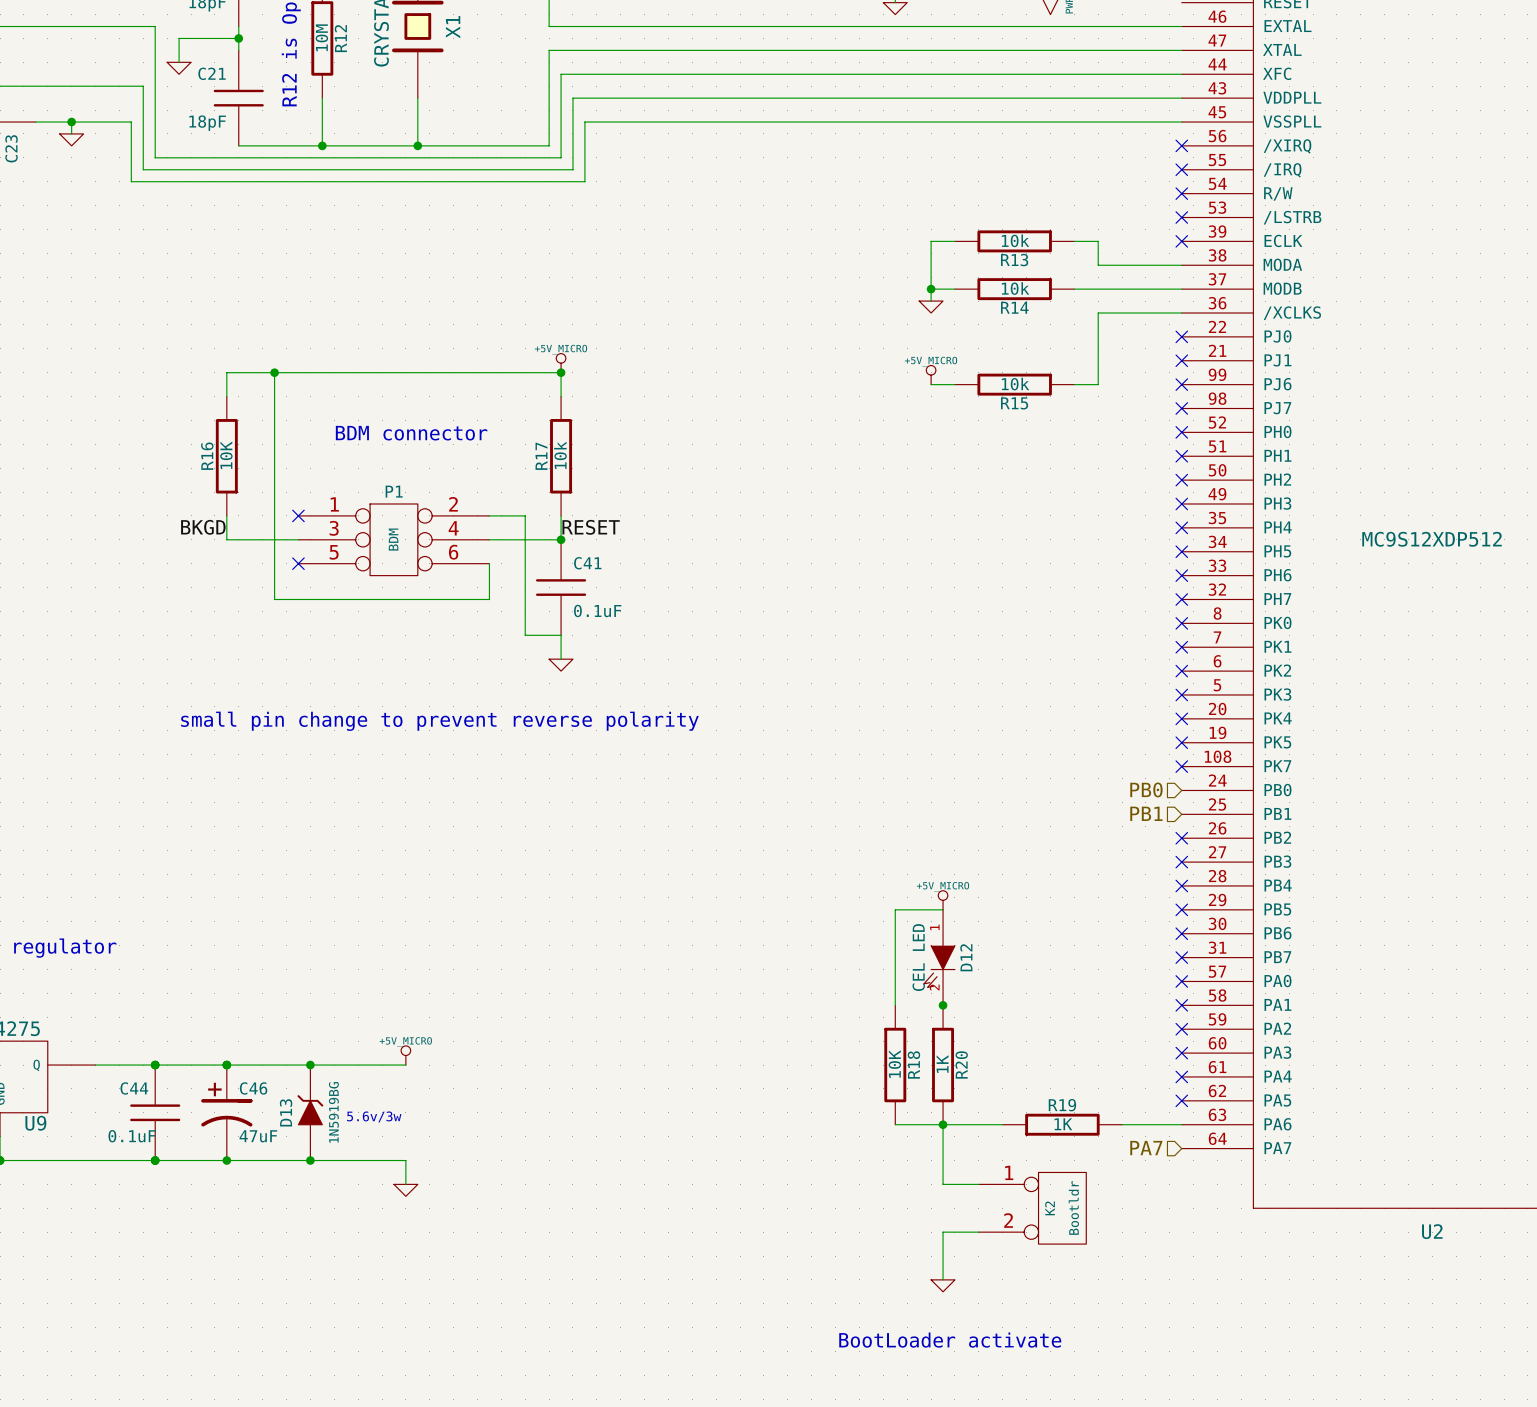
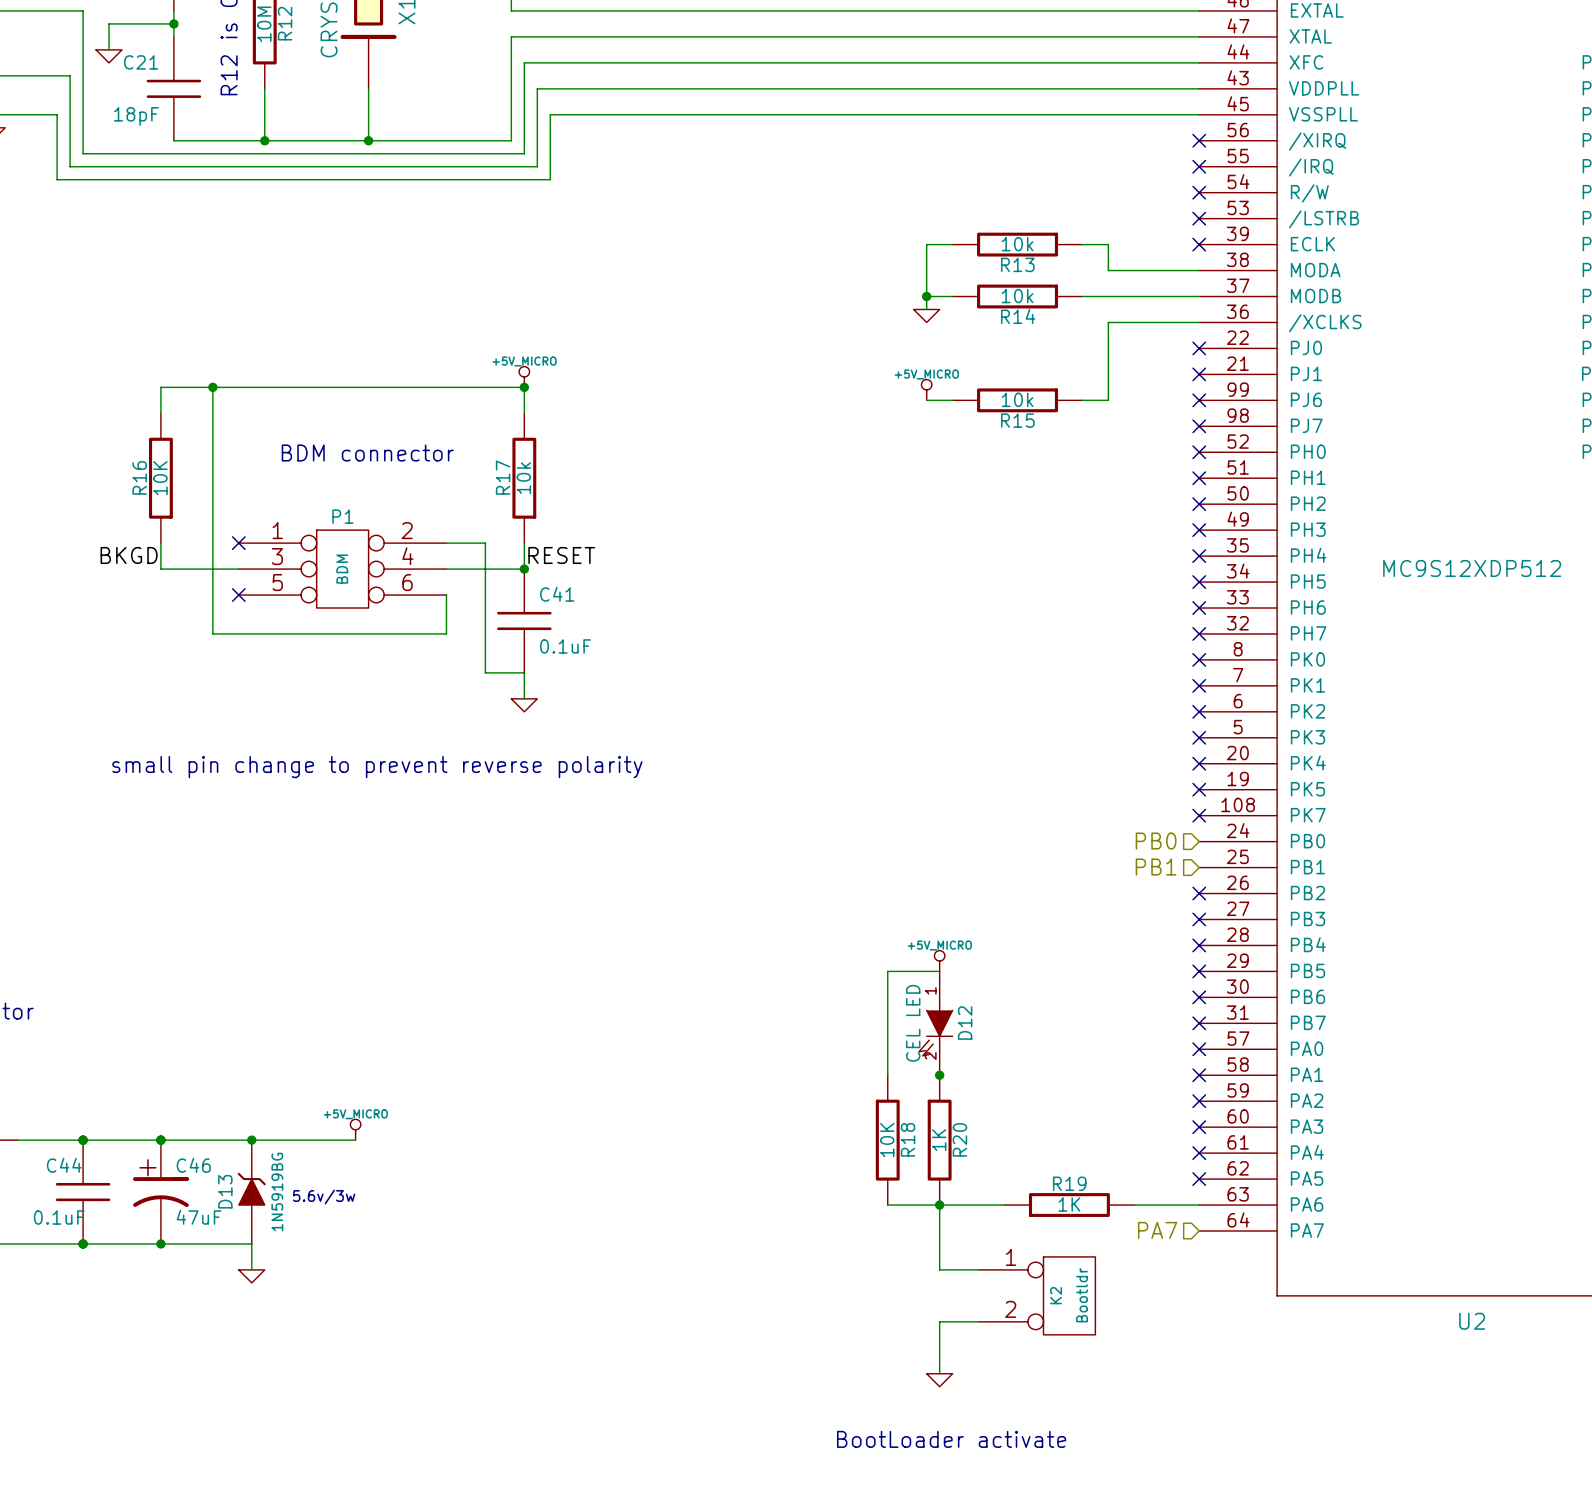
wire: (310, 1160) (405, 1160) (405, 1184) -> (251, 1243) (251, 1269)
junction: (310, 1160) -> none
power symbol position: (405, 1190) -> (251, 1276)

